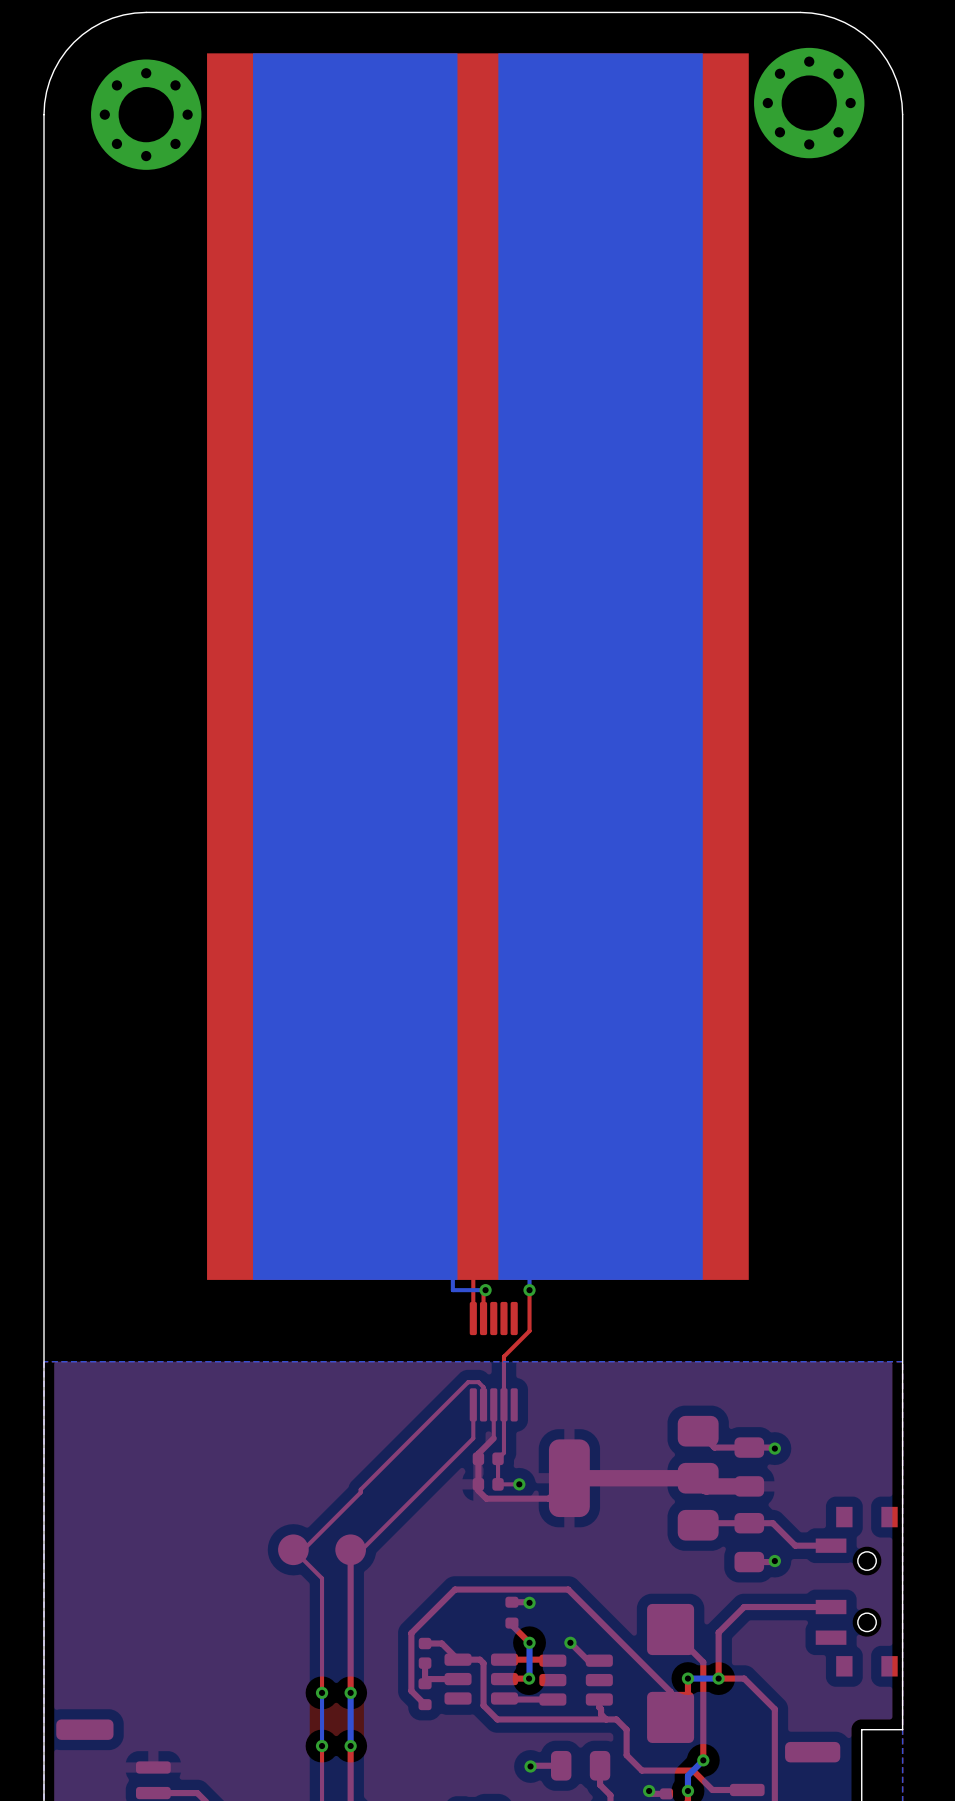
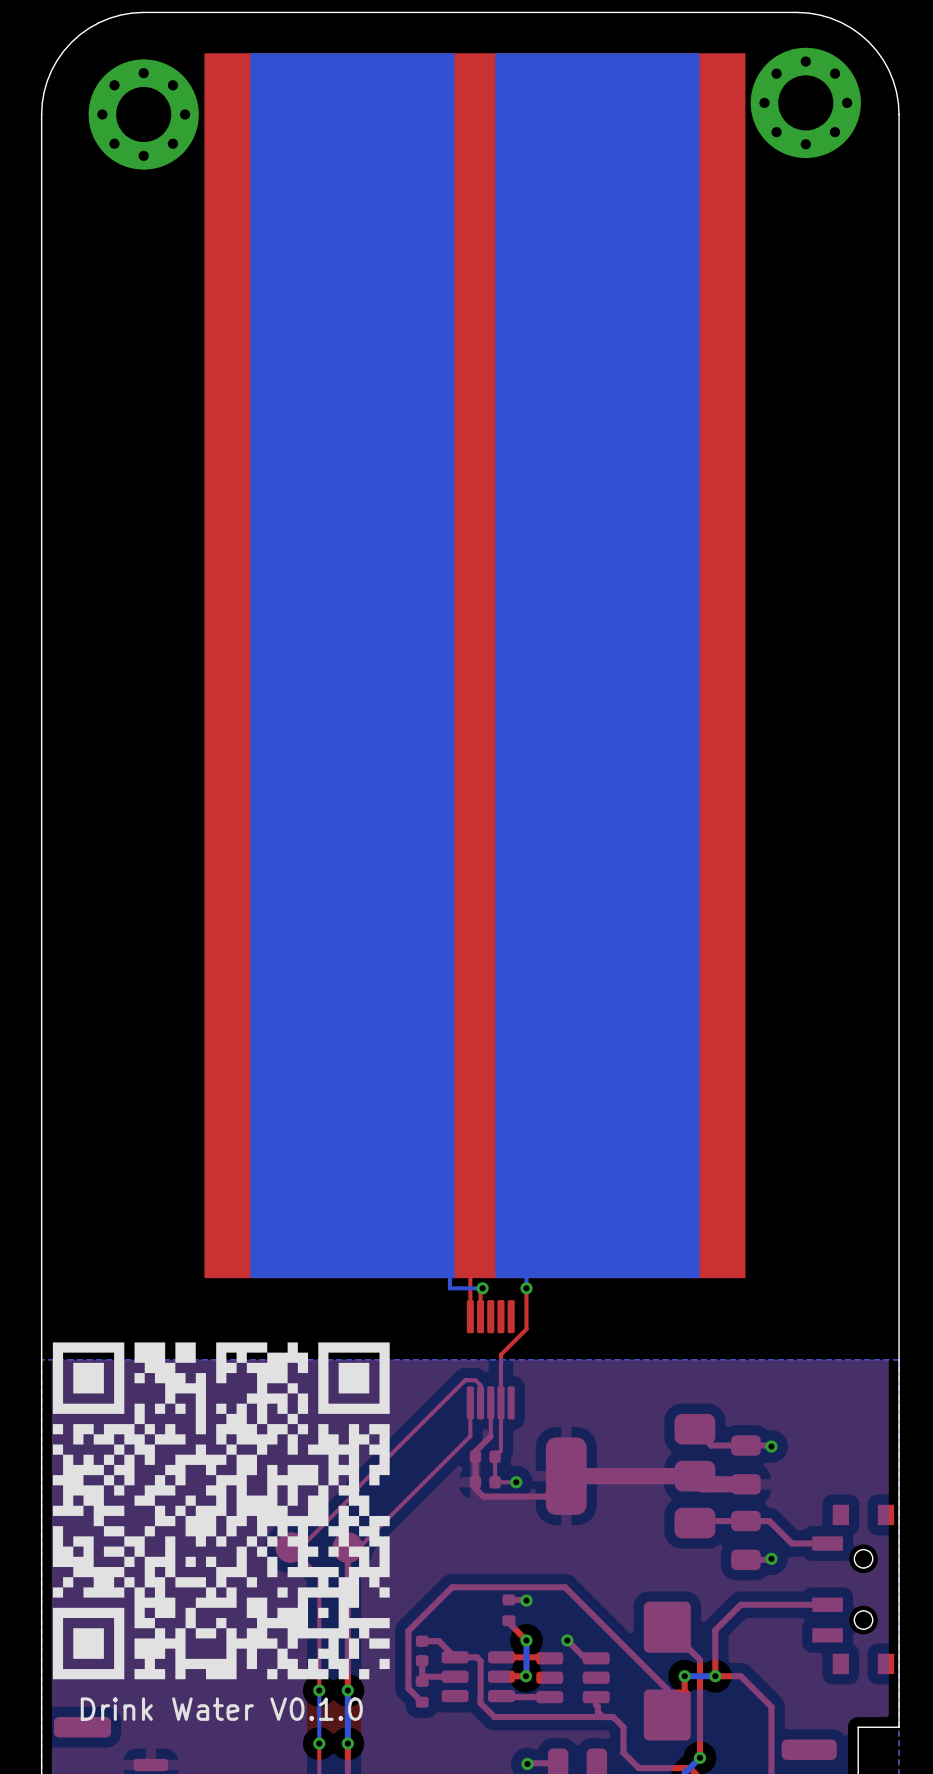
Drink Water V0.1.0: none -> (221, 1510)

